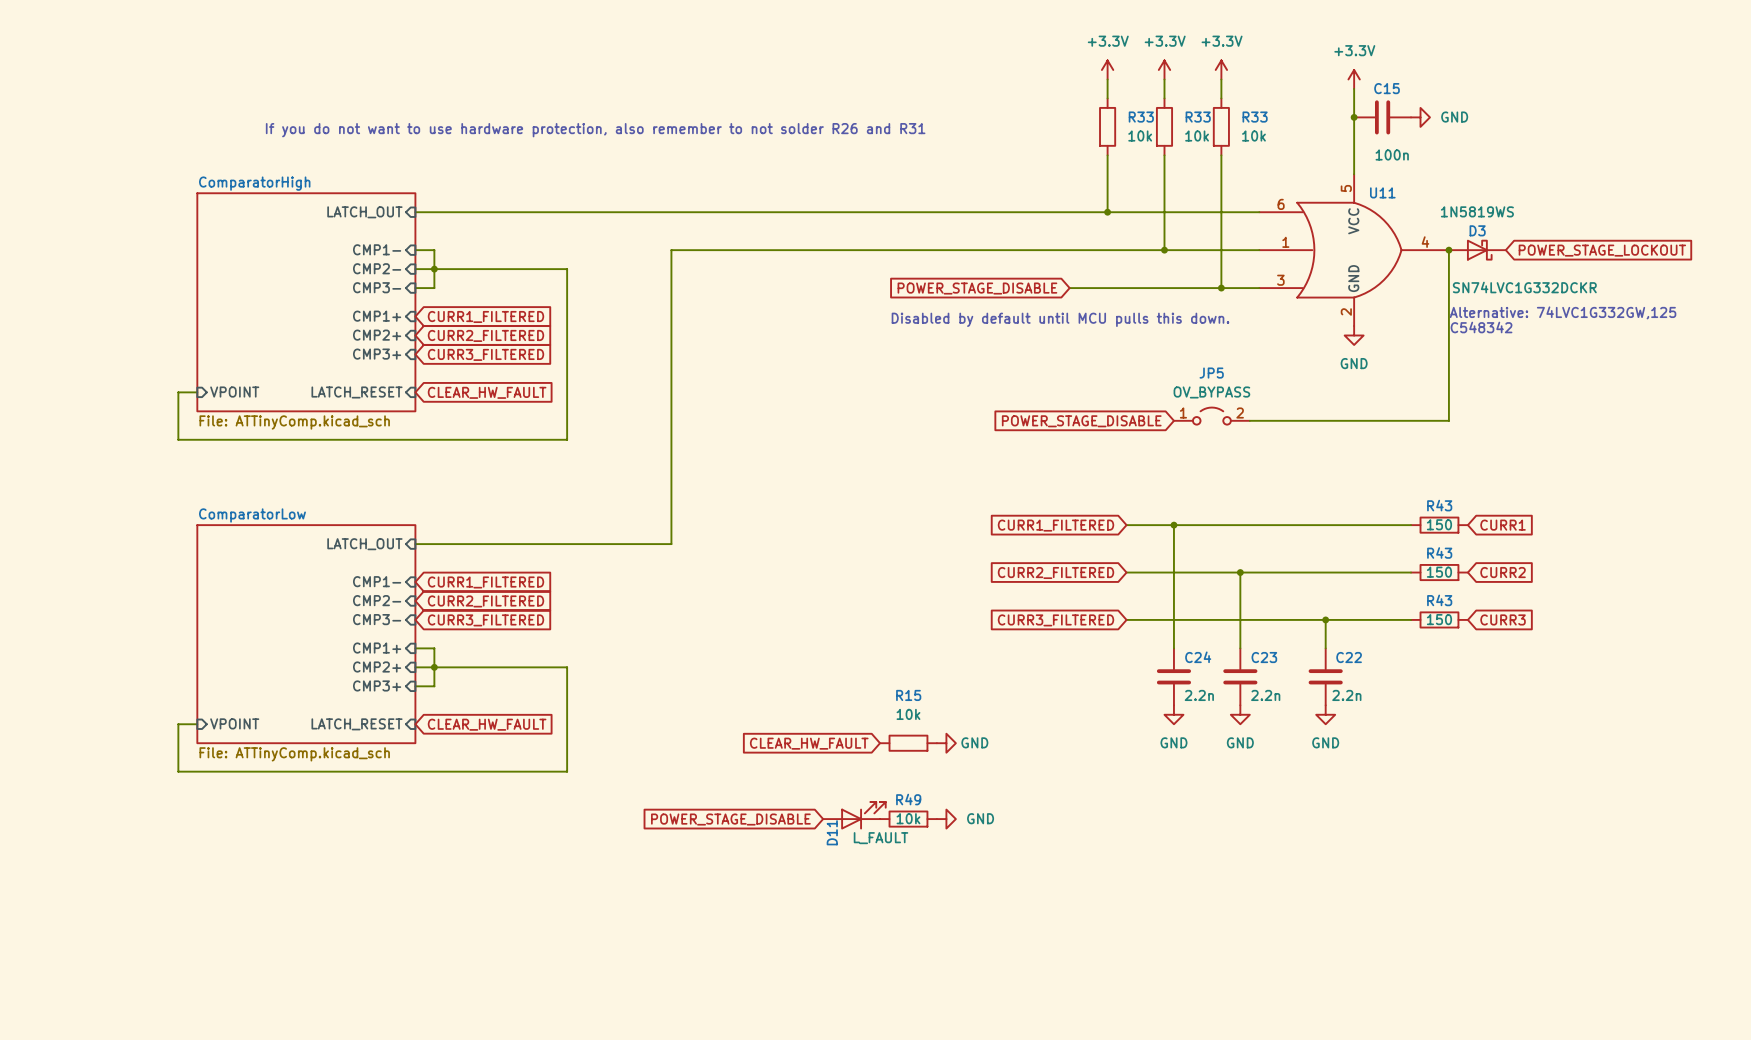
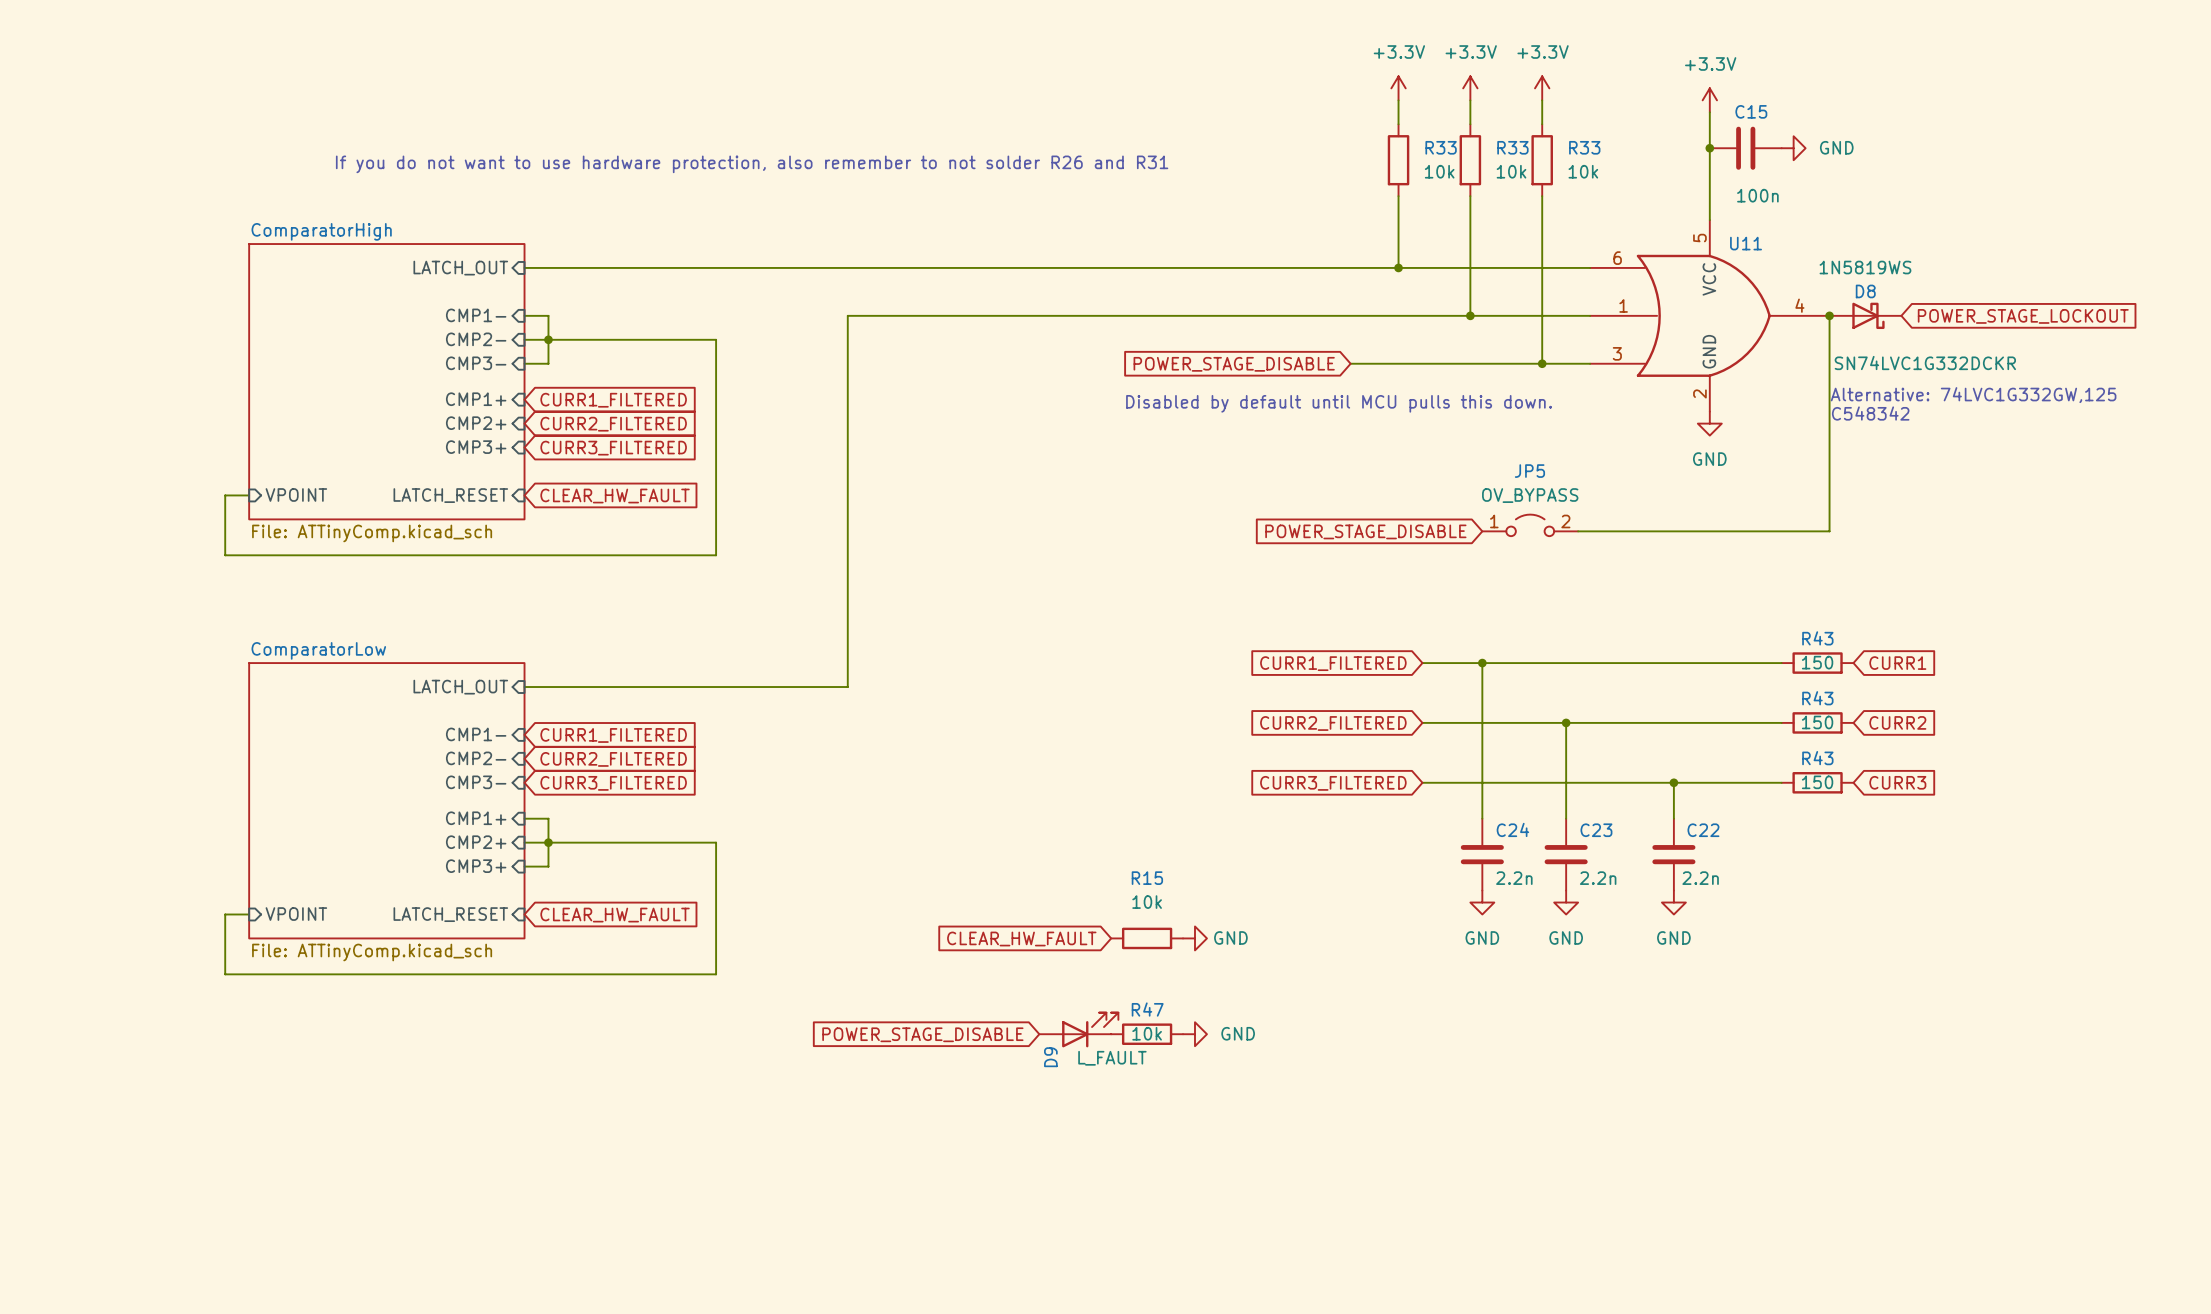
D3 name: D3 (1477, 230) -> D8 (1865, 291)
R49 name: R49 (908, 799) -> R47 (1147, 1009)
D11 name: D11 (832, 832) -> D9 (1050, 1057)

